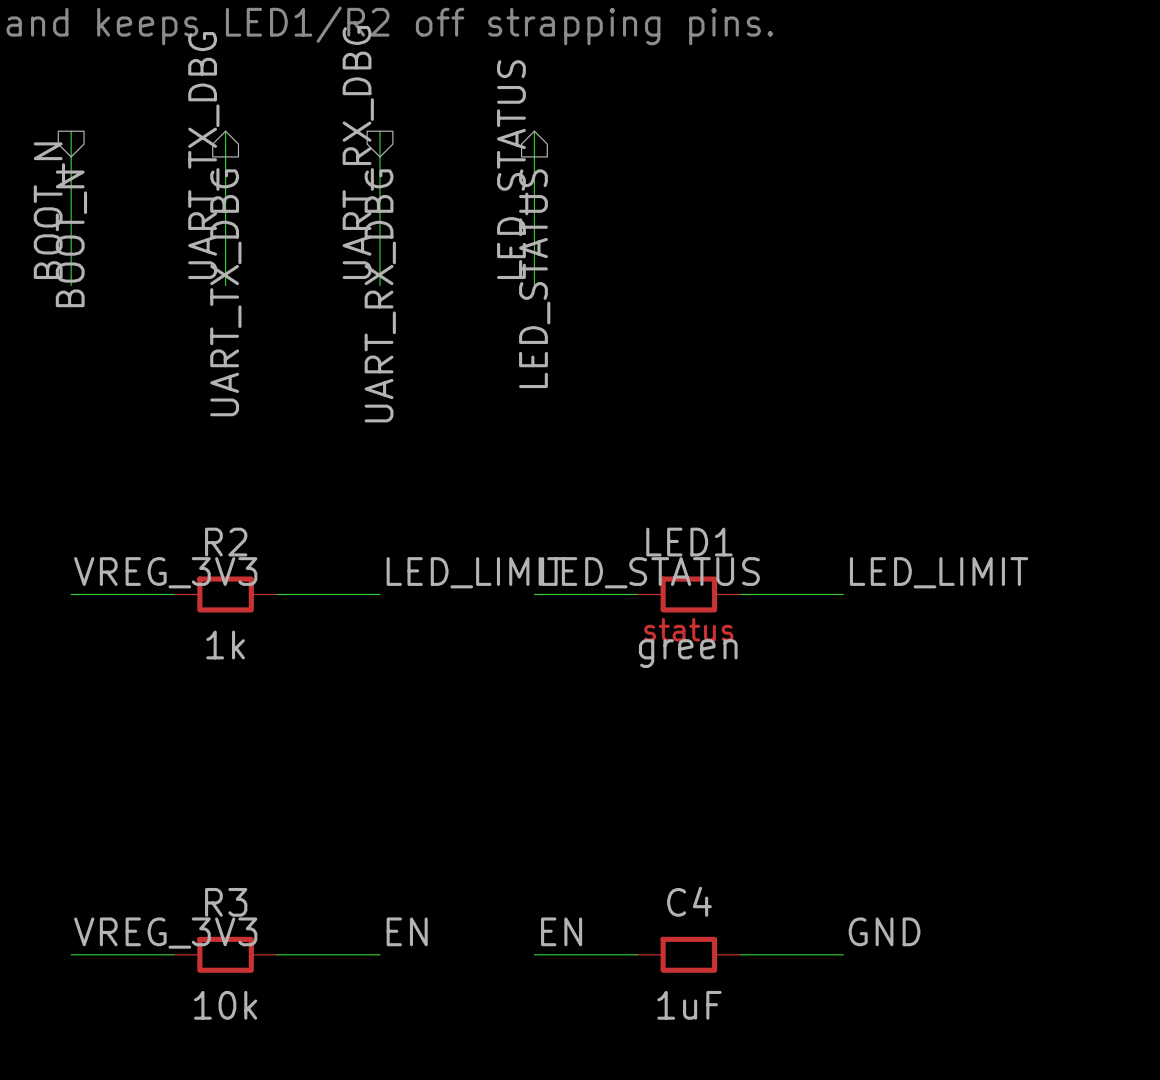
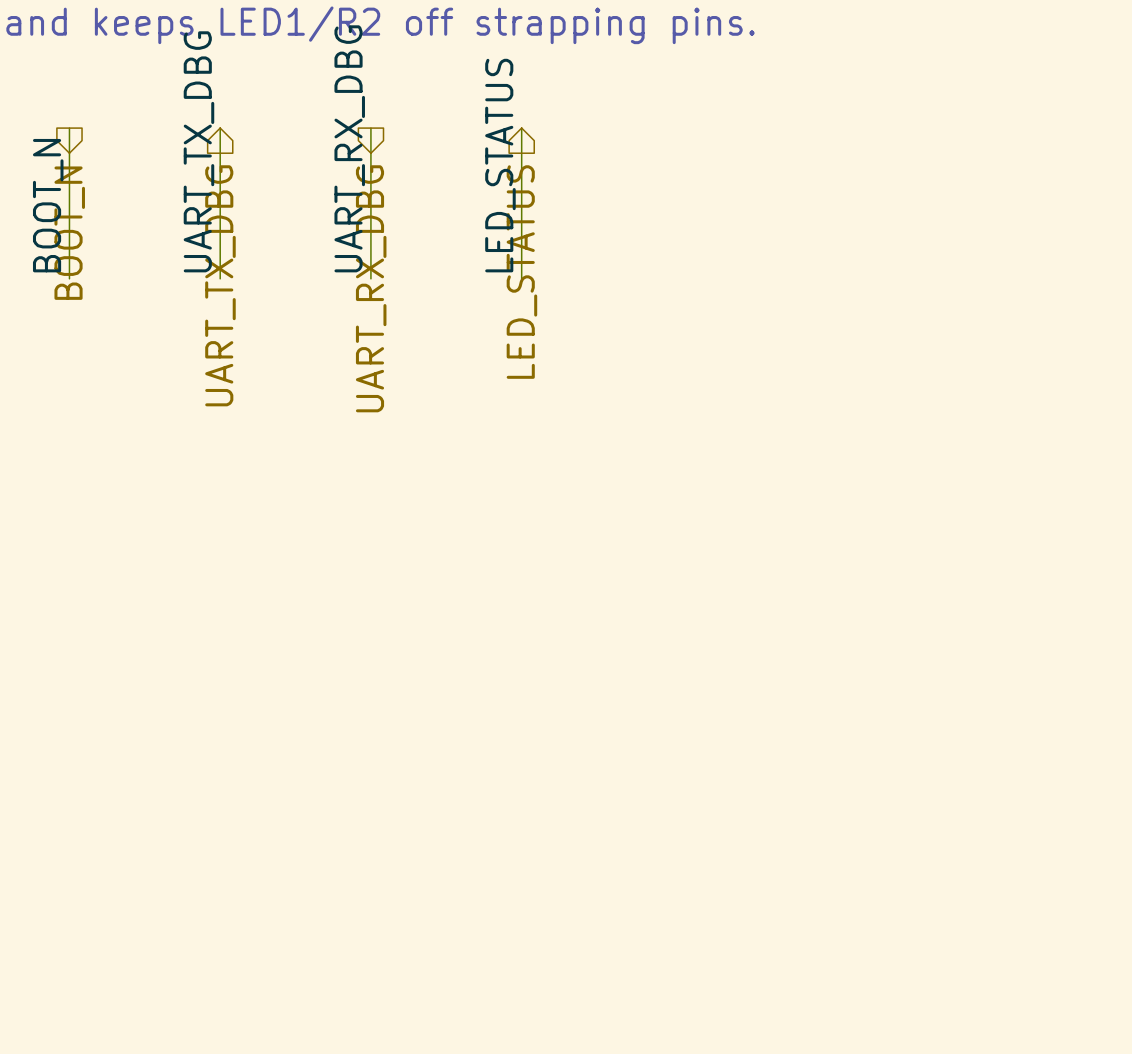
label: VREG_3V3 (165, 572) -> none
label: LED_LIMIT (475, 572) -> none
label: LED_STATUS (650, 572) -> none
label: LED_LIMIT (939, 572) -> none
wire: (71, 594) (174, 594) -> none
R2: 1k (225, 594) -> none
wire: (277, 594) (380, 594) -> none
wire: (534, 594) (637, 594) -> none
LED1: green (688, 594) -> none
wire: (740, 594) (843, 594) -> none
label: EN (407, 931) -> none
label: EN (561, 931) -> none
label: GND (884, 931) -> none
label: VREG_3V3 (165, 933) -> none
wire: (71, 954) (174, 954) -> none
R3: 10k (225, 954) -> none
wire: (277, 954) (380, 954) -> none
wire: (534, 954) (637, 954) -> none
C4: 1uF (688, 954) -> none
wire: (740, 954) (843, 954) -> none

